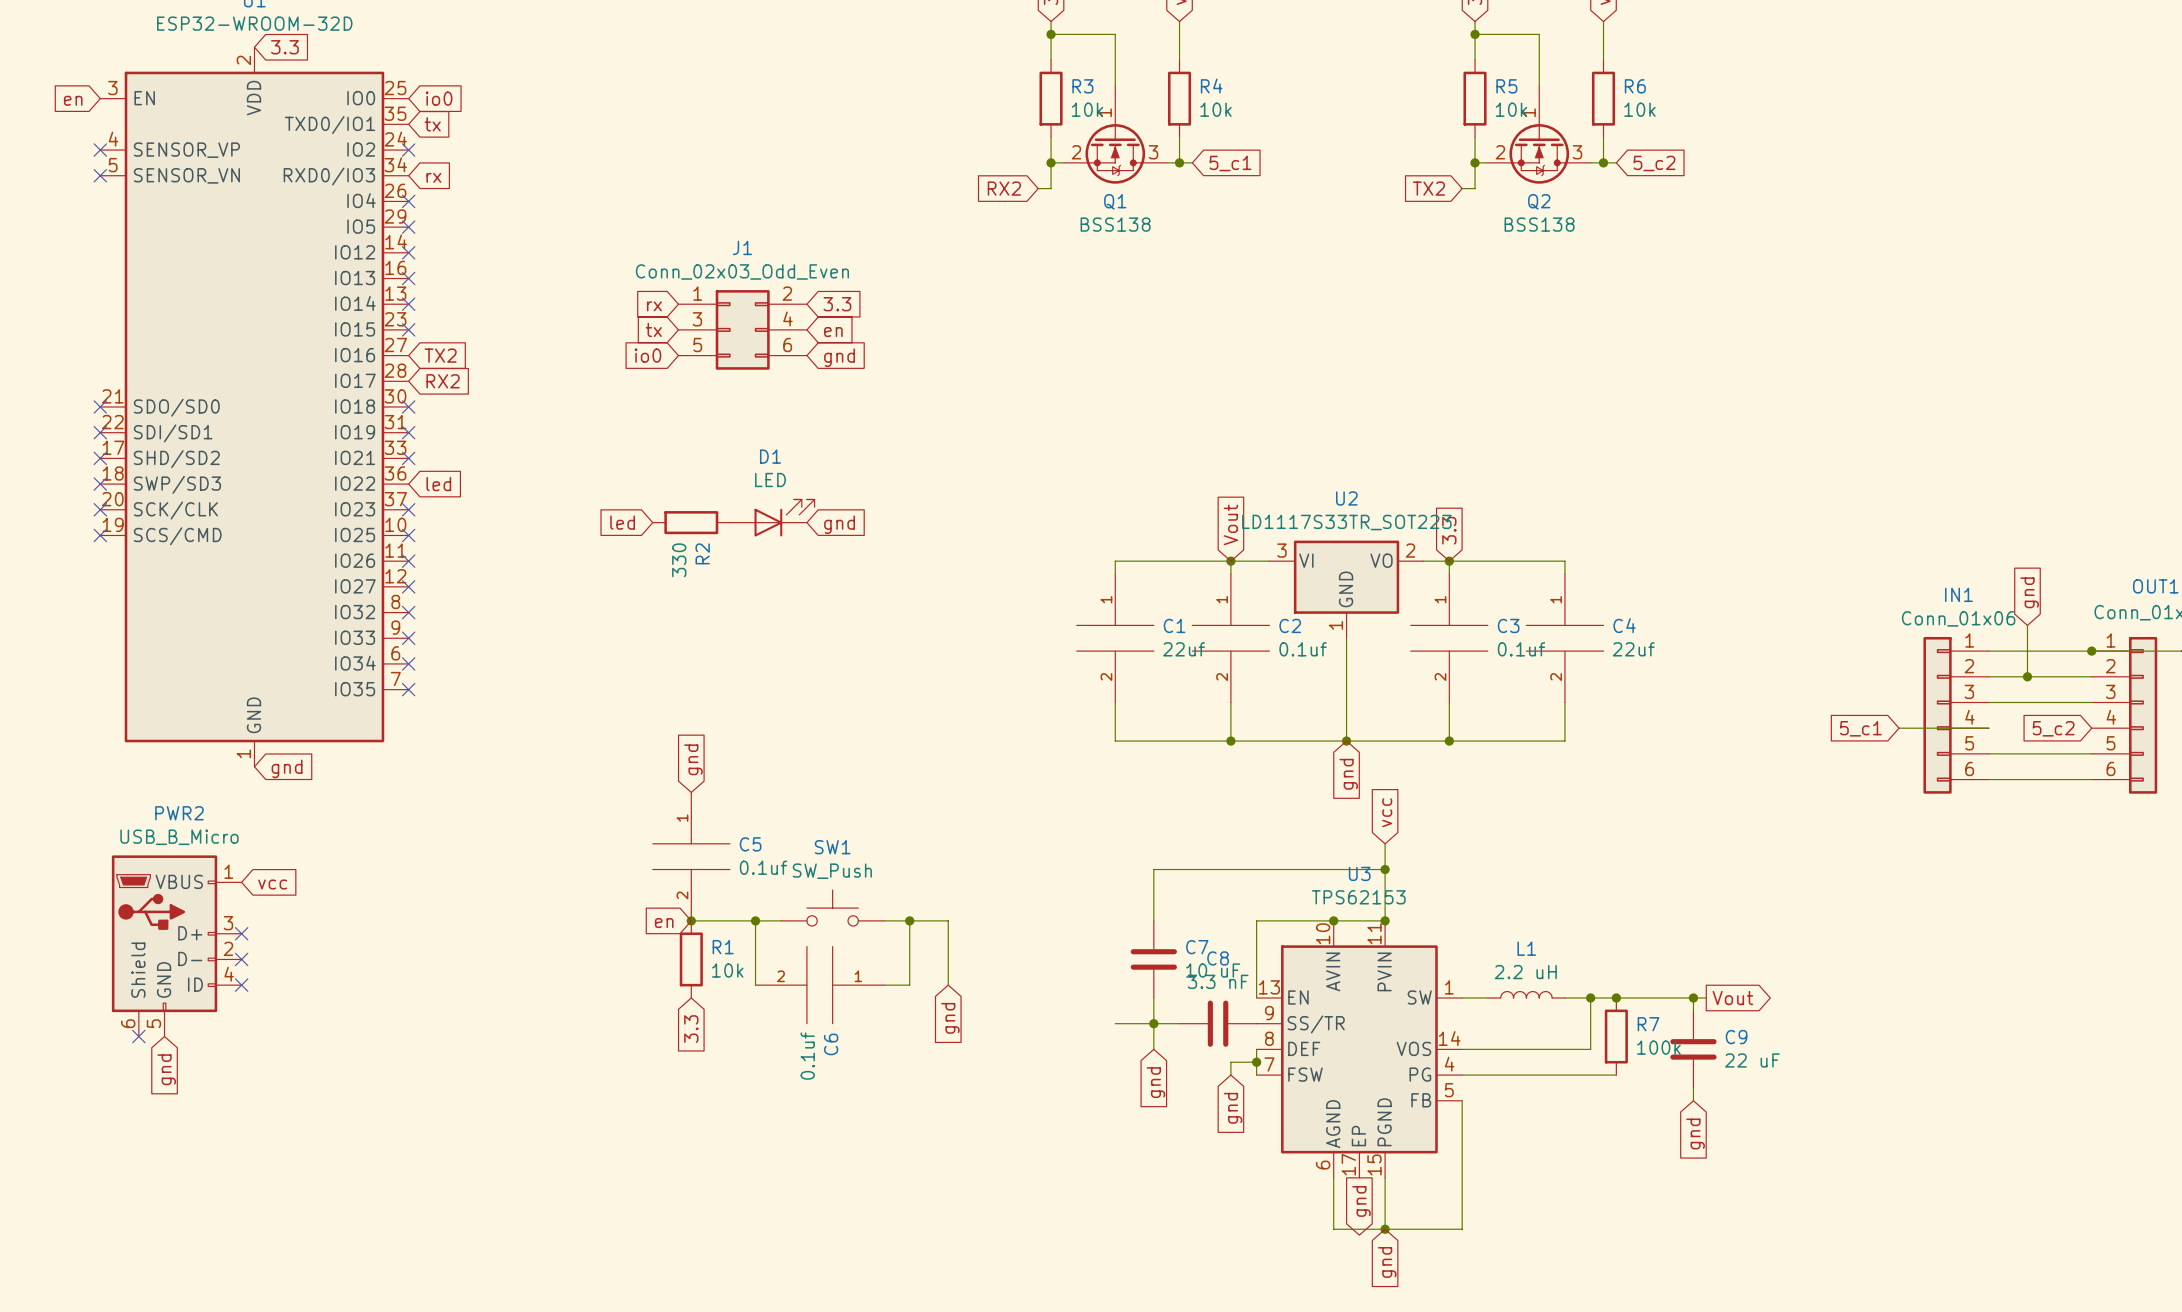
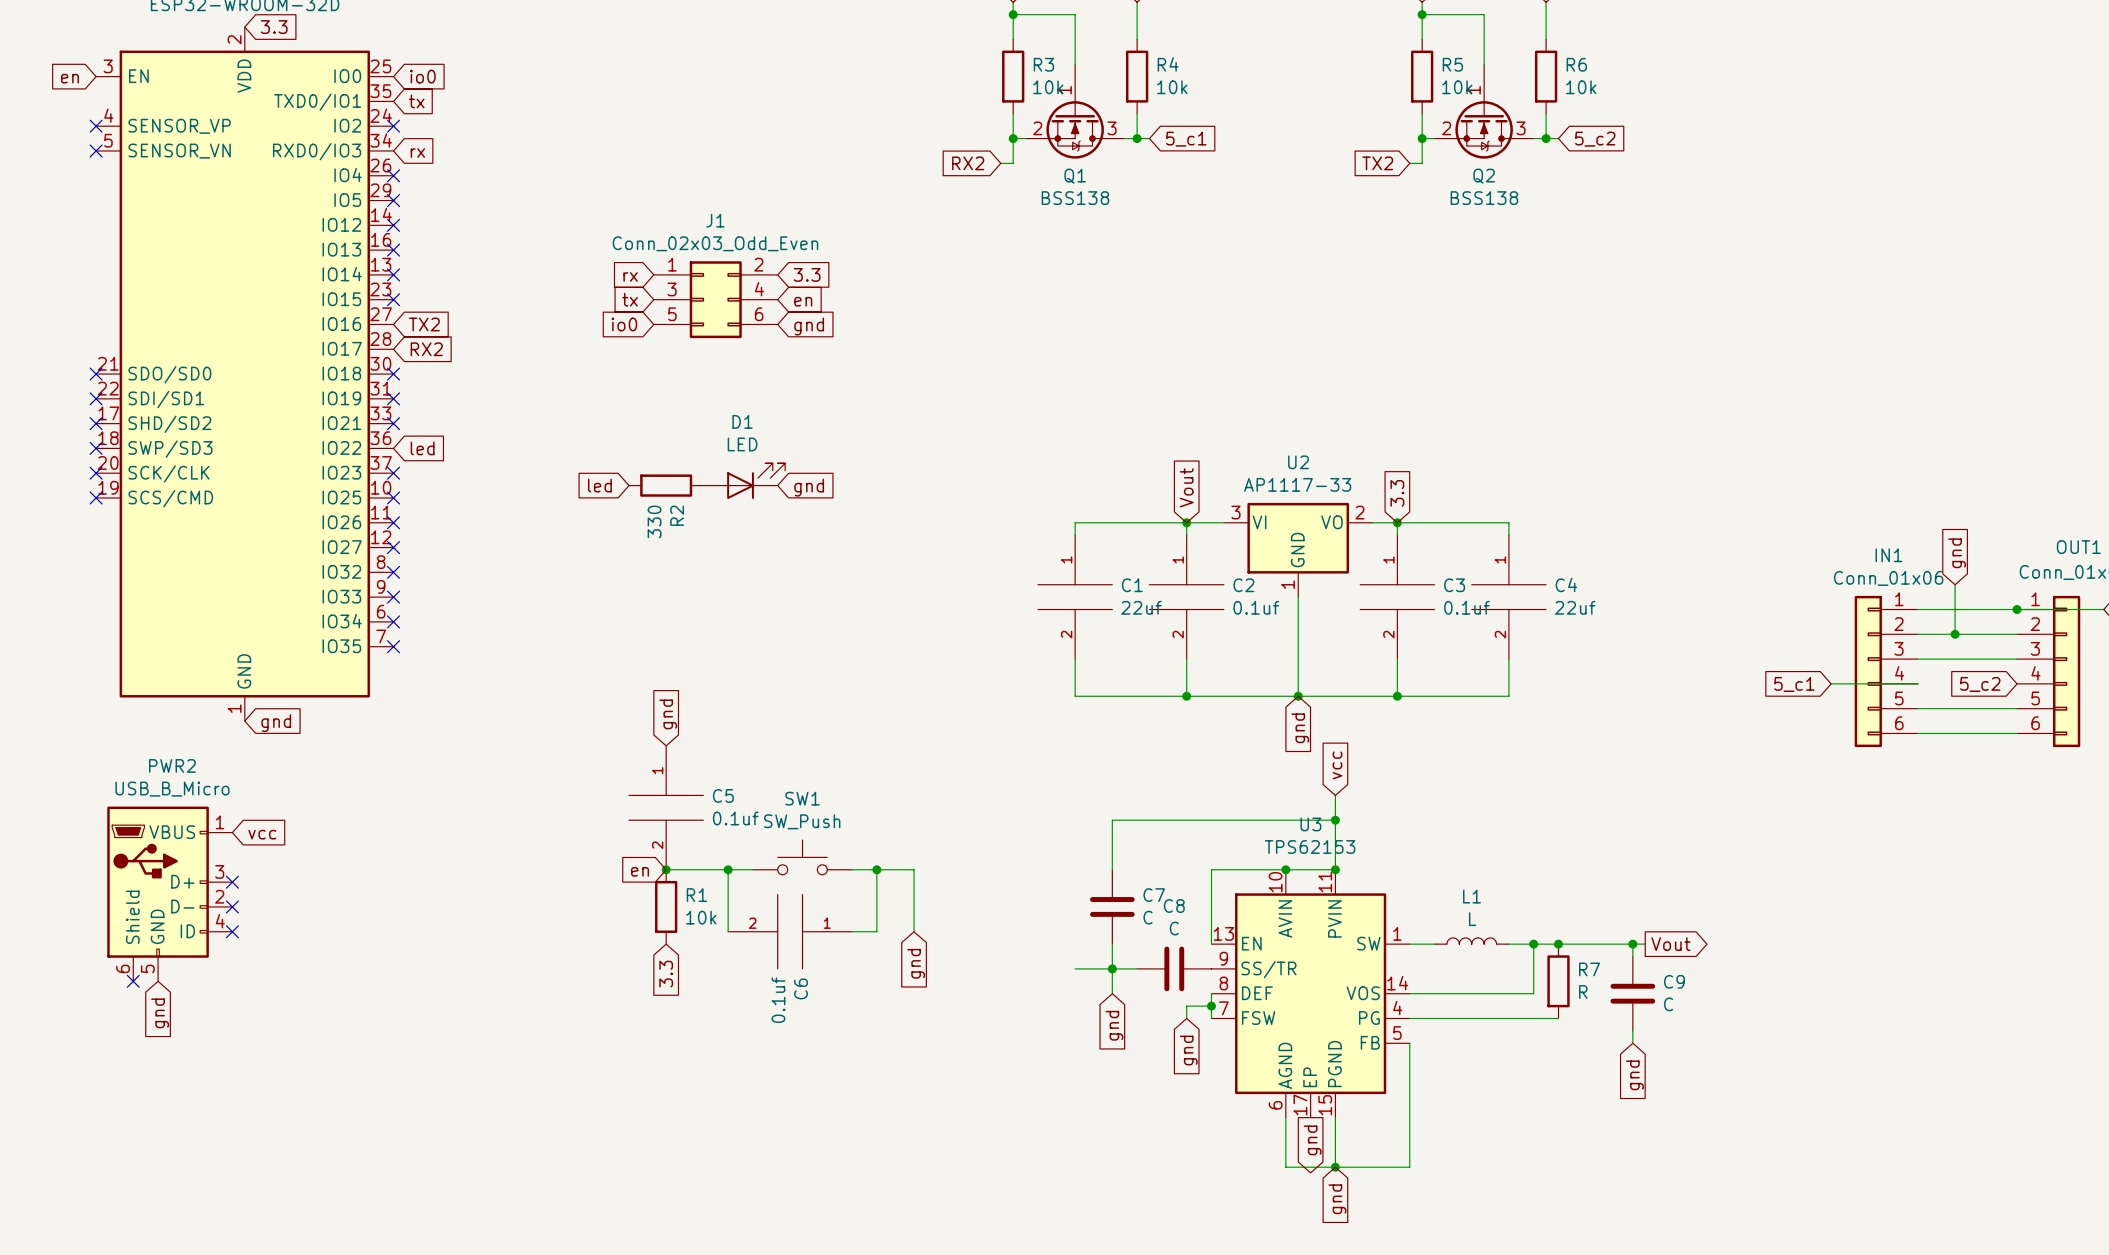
U2 value: LD1117S33TR_SOT223 (1346, 522) -> AP1117-33 (1297, 484)
C7 value: 10 uF (1213, 970) -> C (1148, 917)
L1 value: 2.2 uH (1525, 972) -> L (1472, 919)
C8 value: 3.3 nF (1218, 981) -> C (1174, 928)
R7 value: 100k (1658, 1047) -> R (1583, 992)
C9 value: 22 uF (1752, 1060) -> C (1668, 1004)

